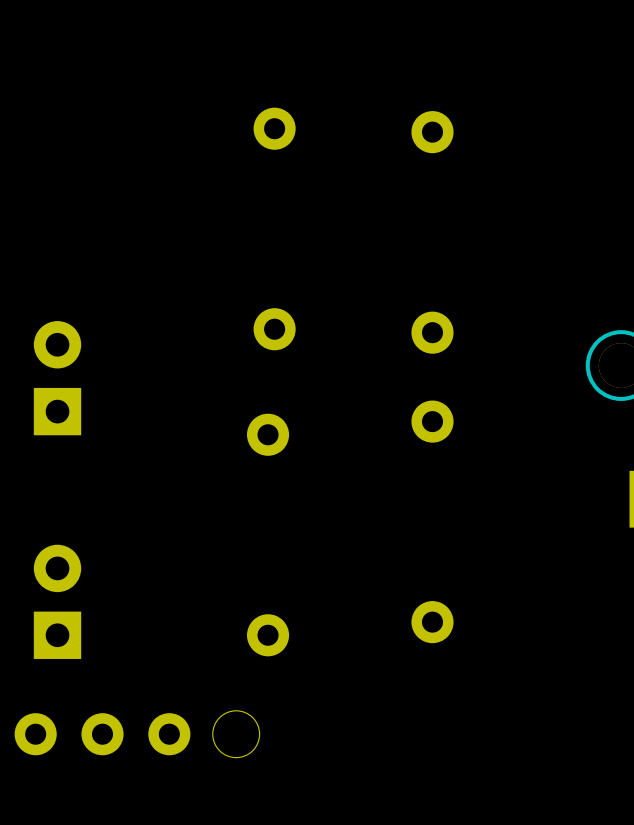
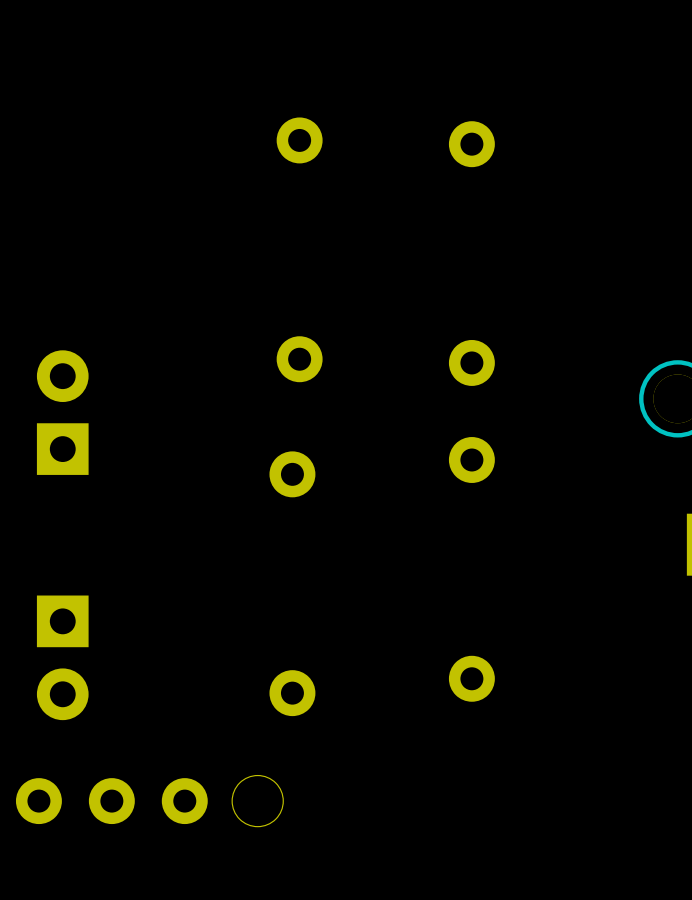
part rotation: 0° (57, 601) -> 180° (62, 657)

